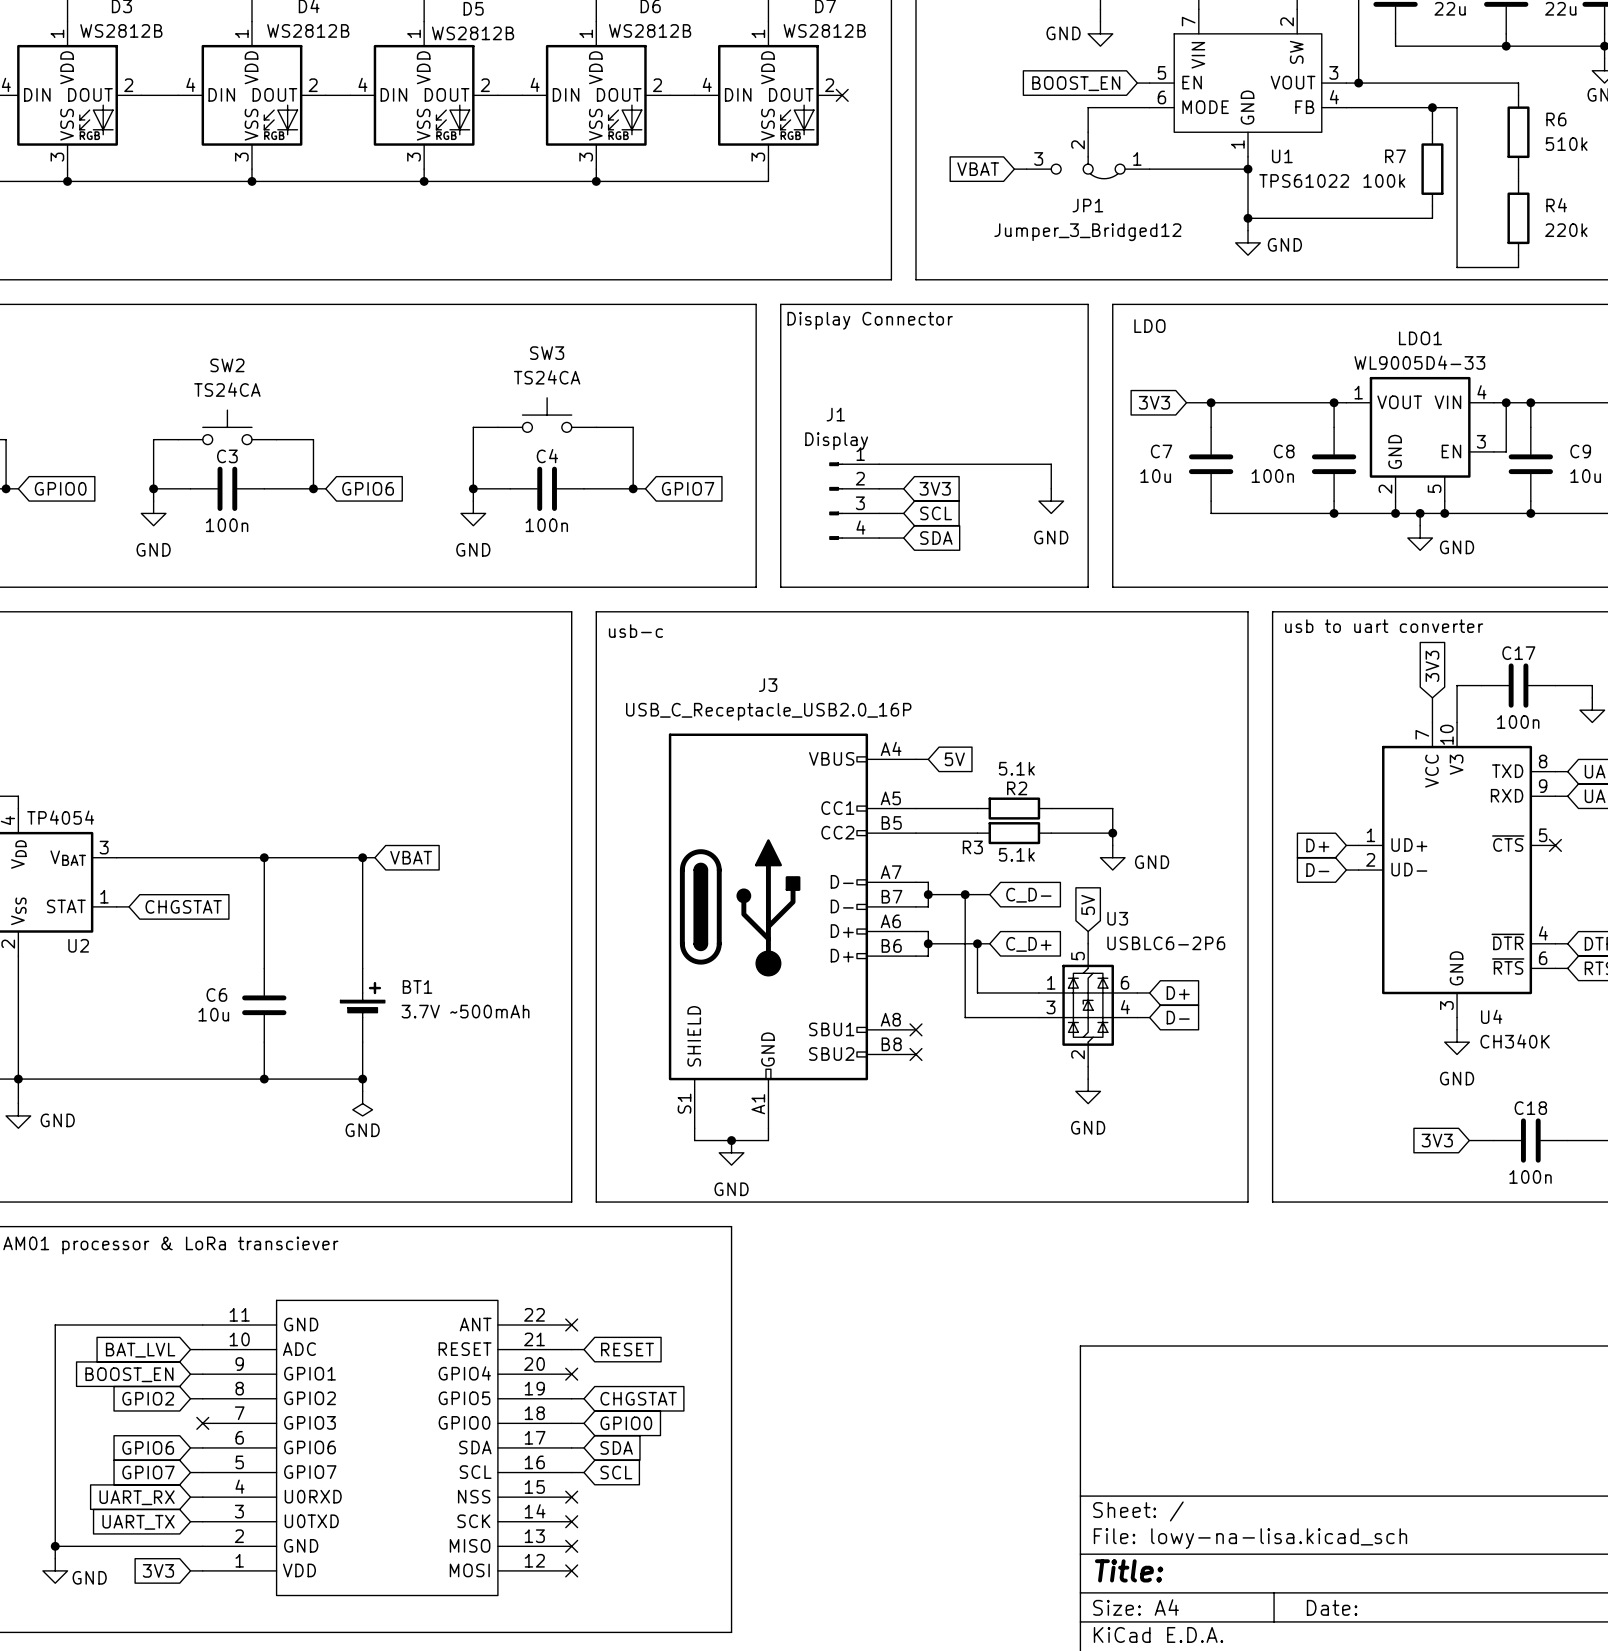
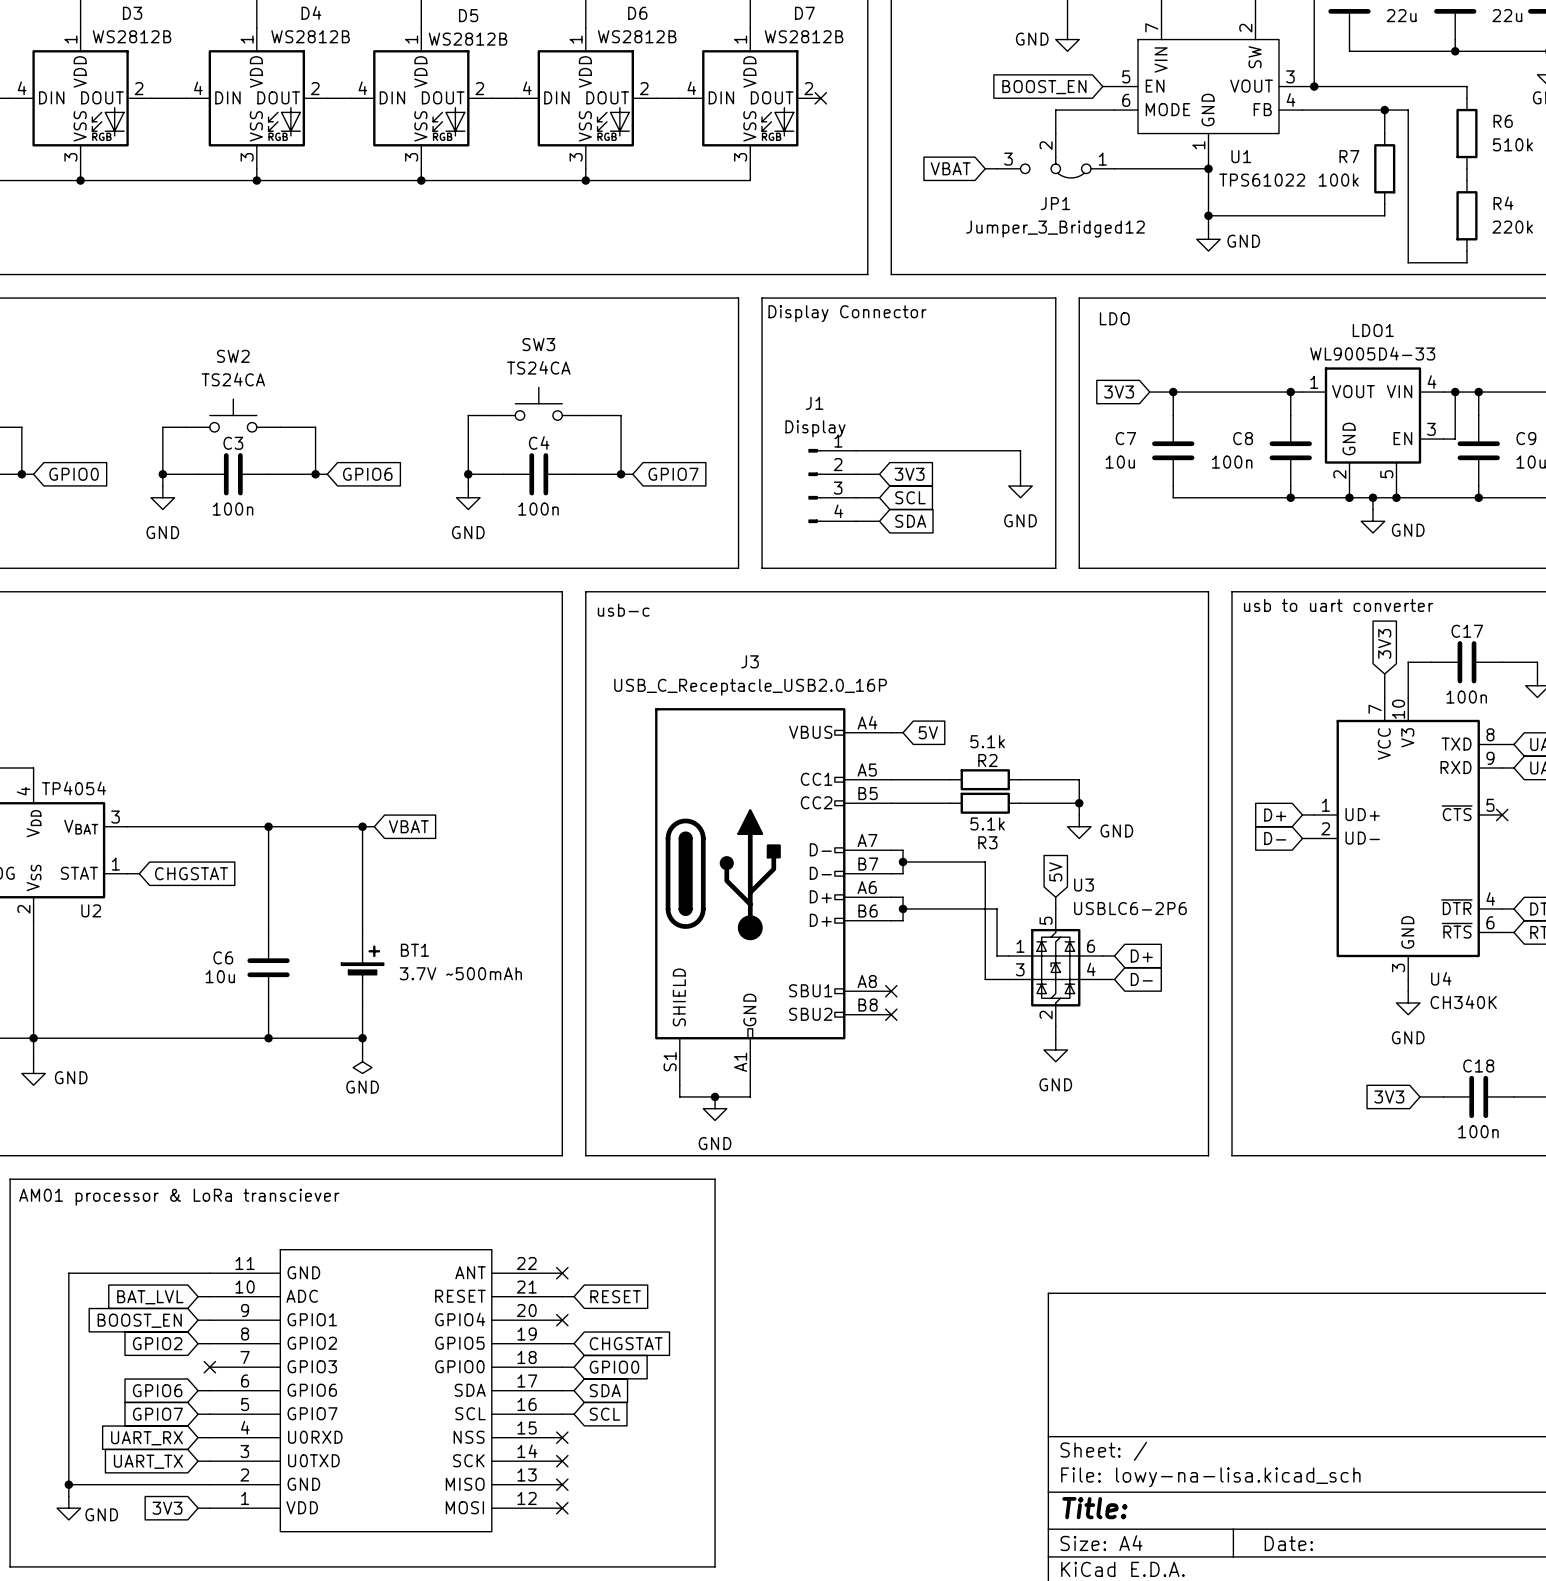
R3 name position: R3 (972, 847) -> R3 (987, 842)
wire: (965, 894) (965, 1017) (1014, 1017) -> (961, 861) (985, 861) (985, 979)
junction: (965, 894) -> none
global label: C_D- (1028, 895) -> none
wire: (977, 943) (977, 992) (1026, 992) -> (961, 908) (997, 908) (997, 955)
junction: (977, 943) -> none
global label: C_D+ (1028, 944) -> none

